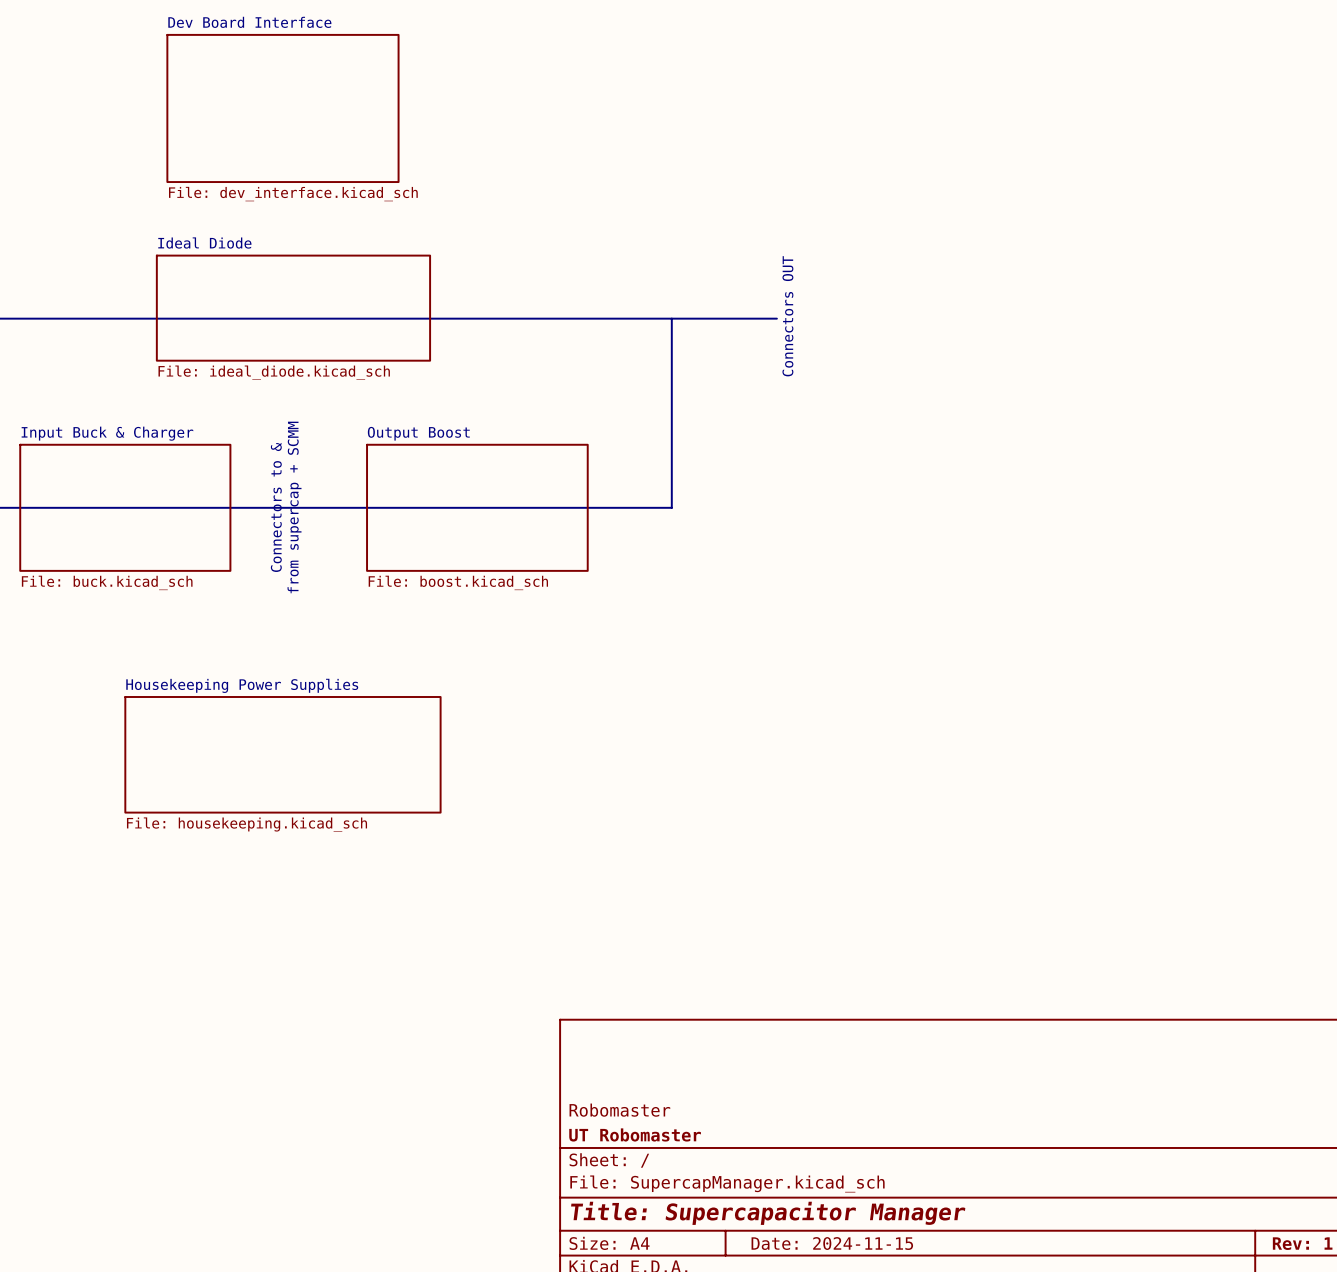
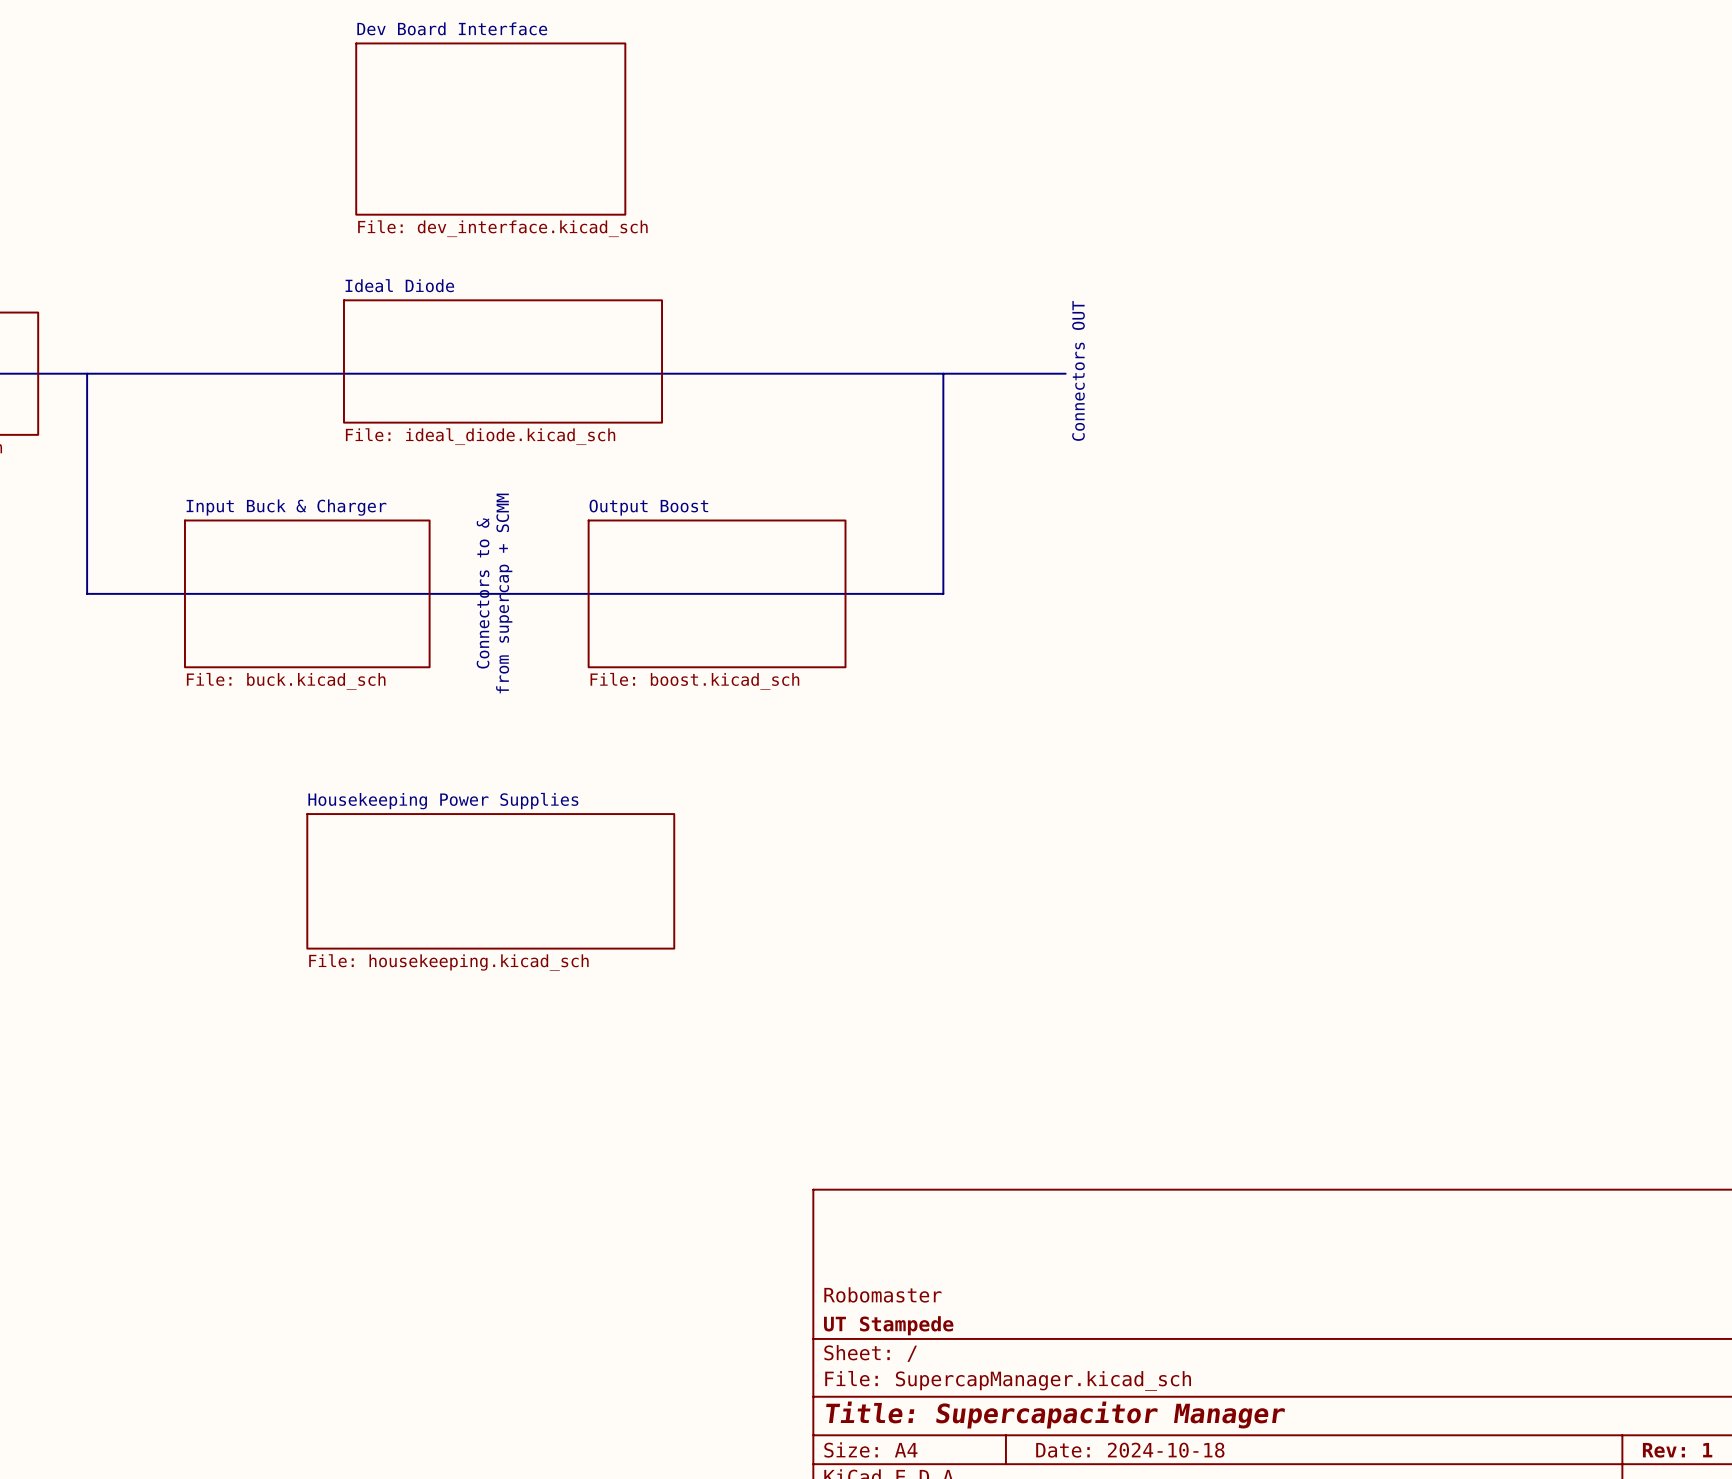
title block: UT Robomaster (635, 1134) -> UT Stampede (888, 1325)
title block: Date: 2024-11-15 (832, 1243) -> Date: 2024-10-18 (1130, 1450)

